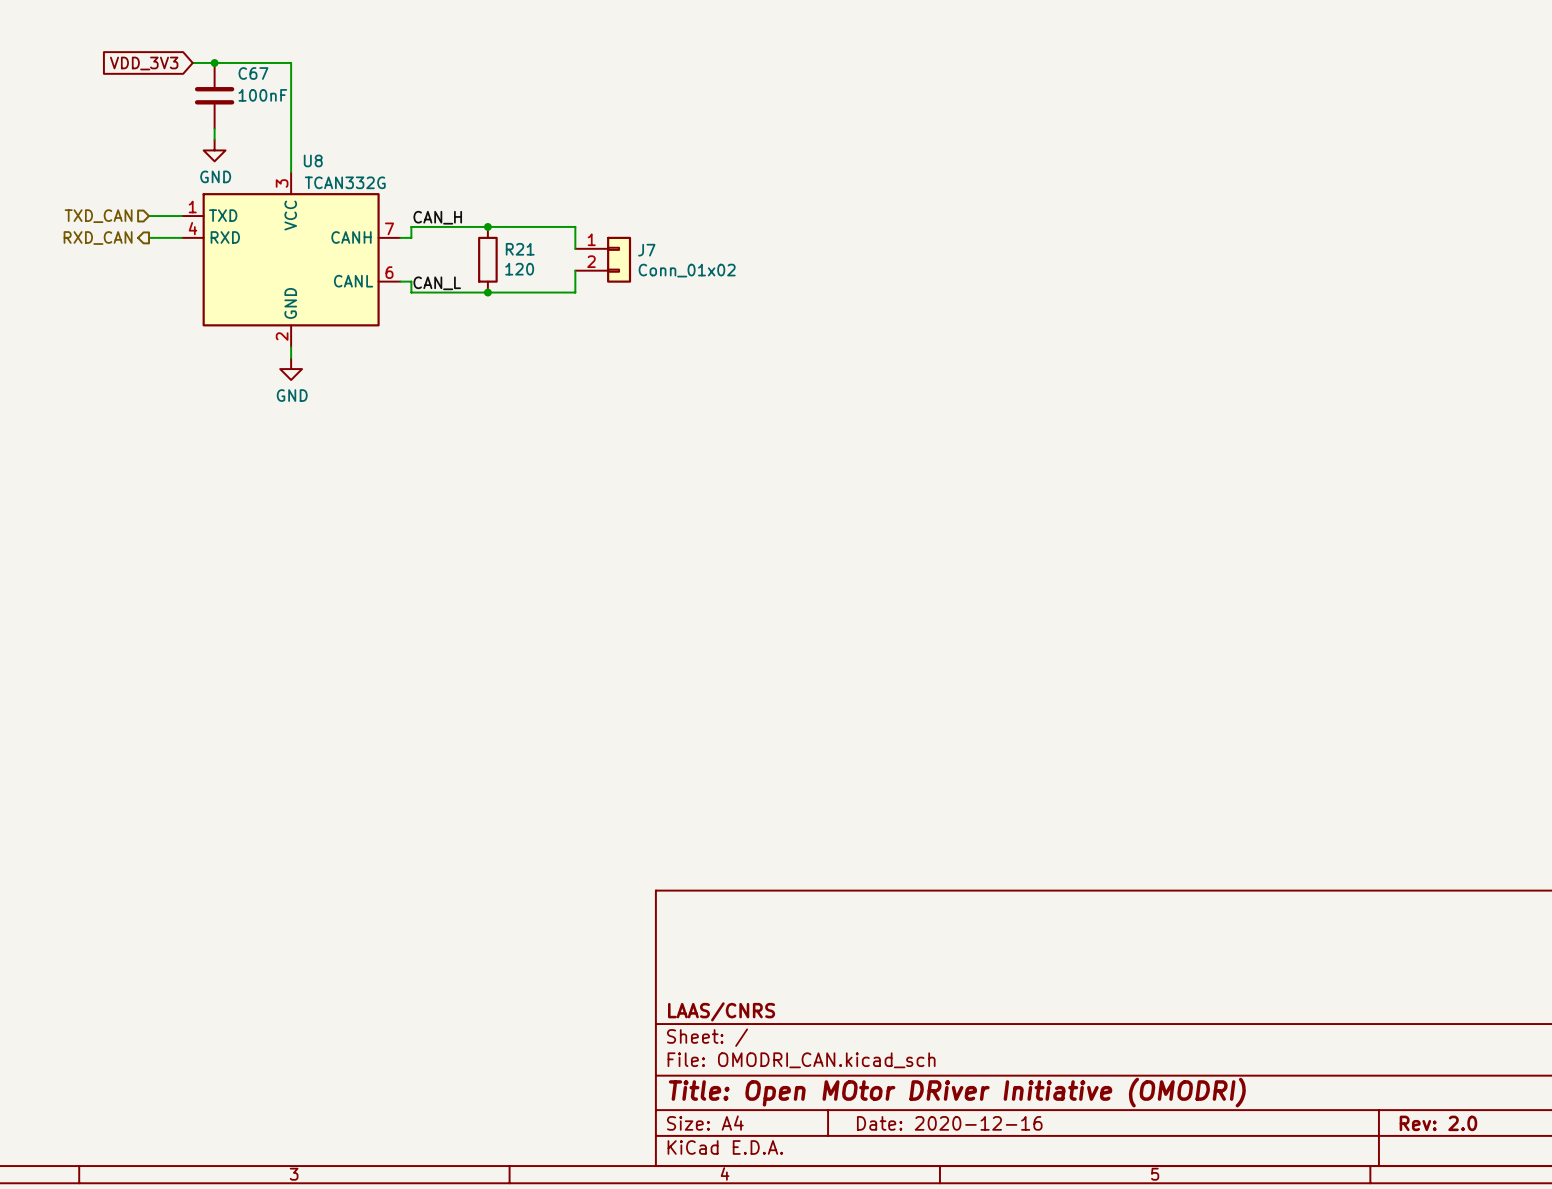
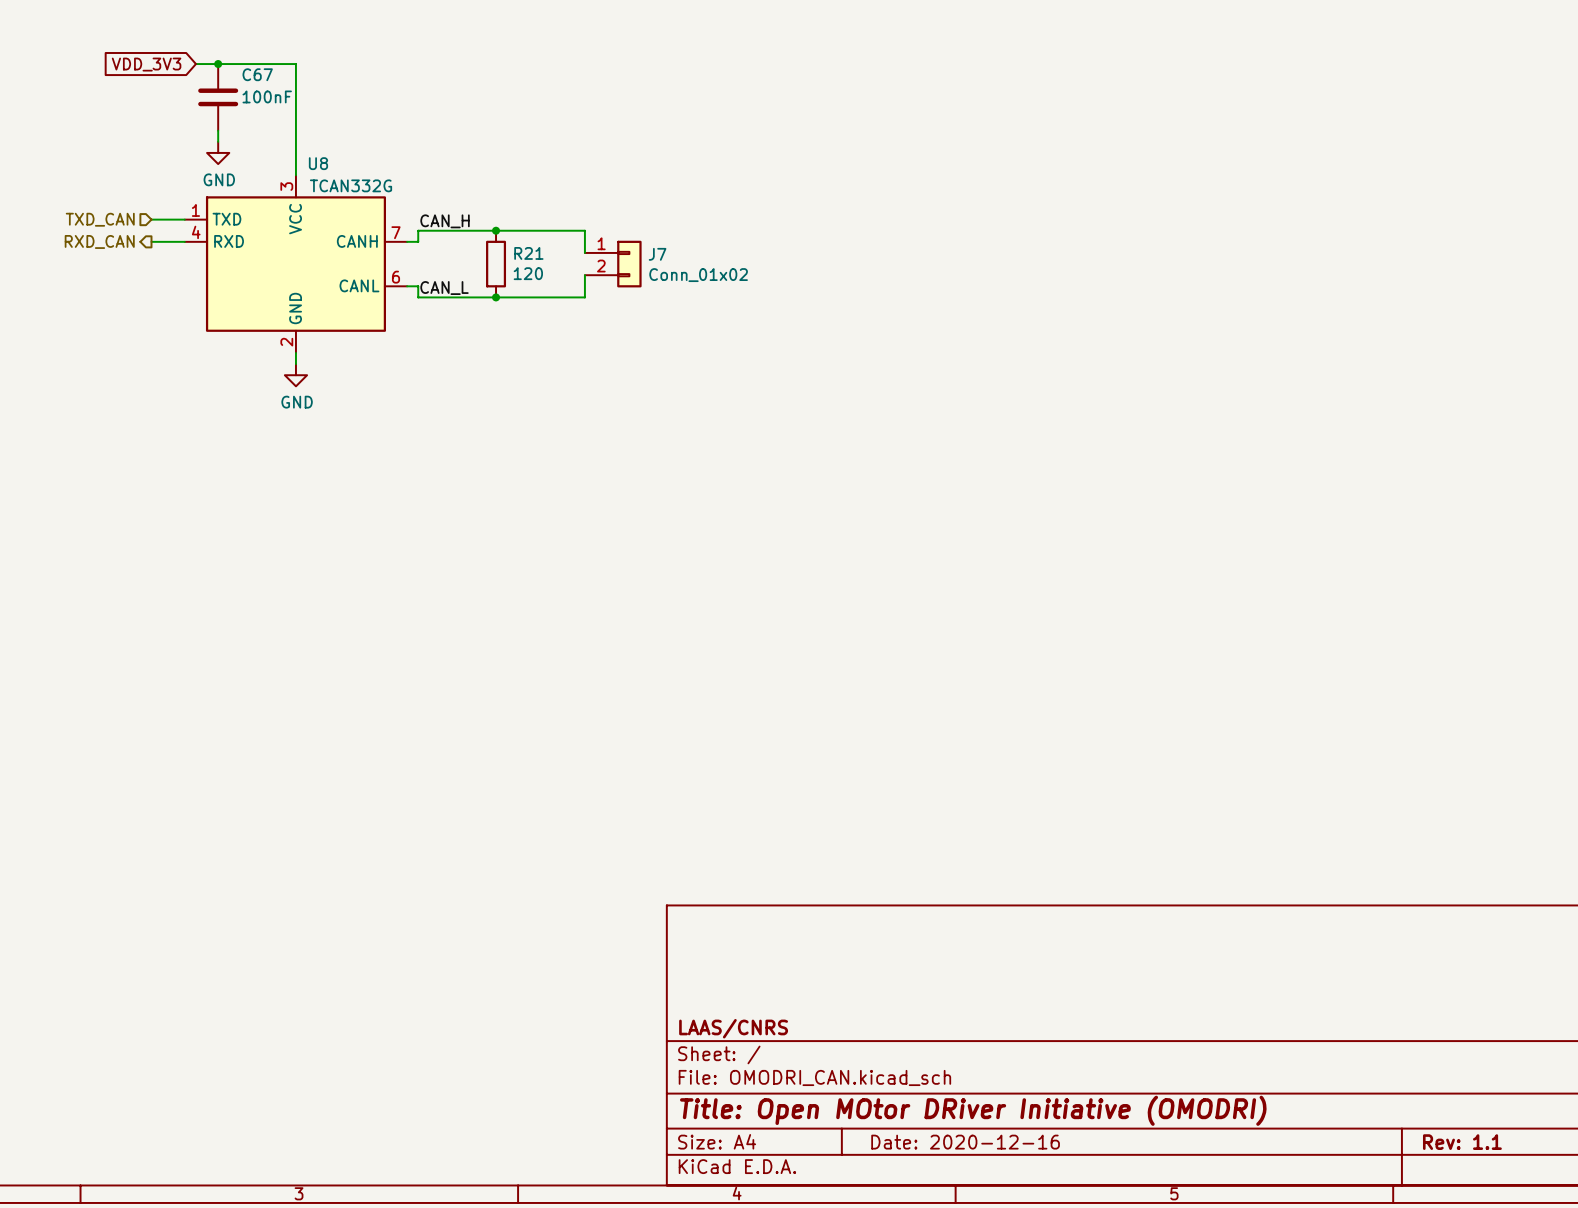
title block: Rev: 2.0 (1438, 1123) -> Rev: 1.1 (1462, 1142)

